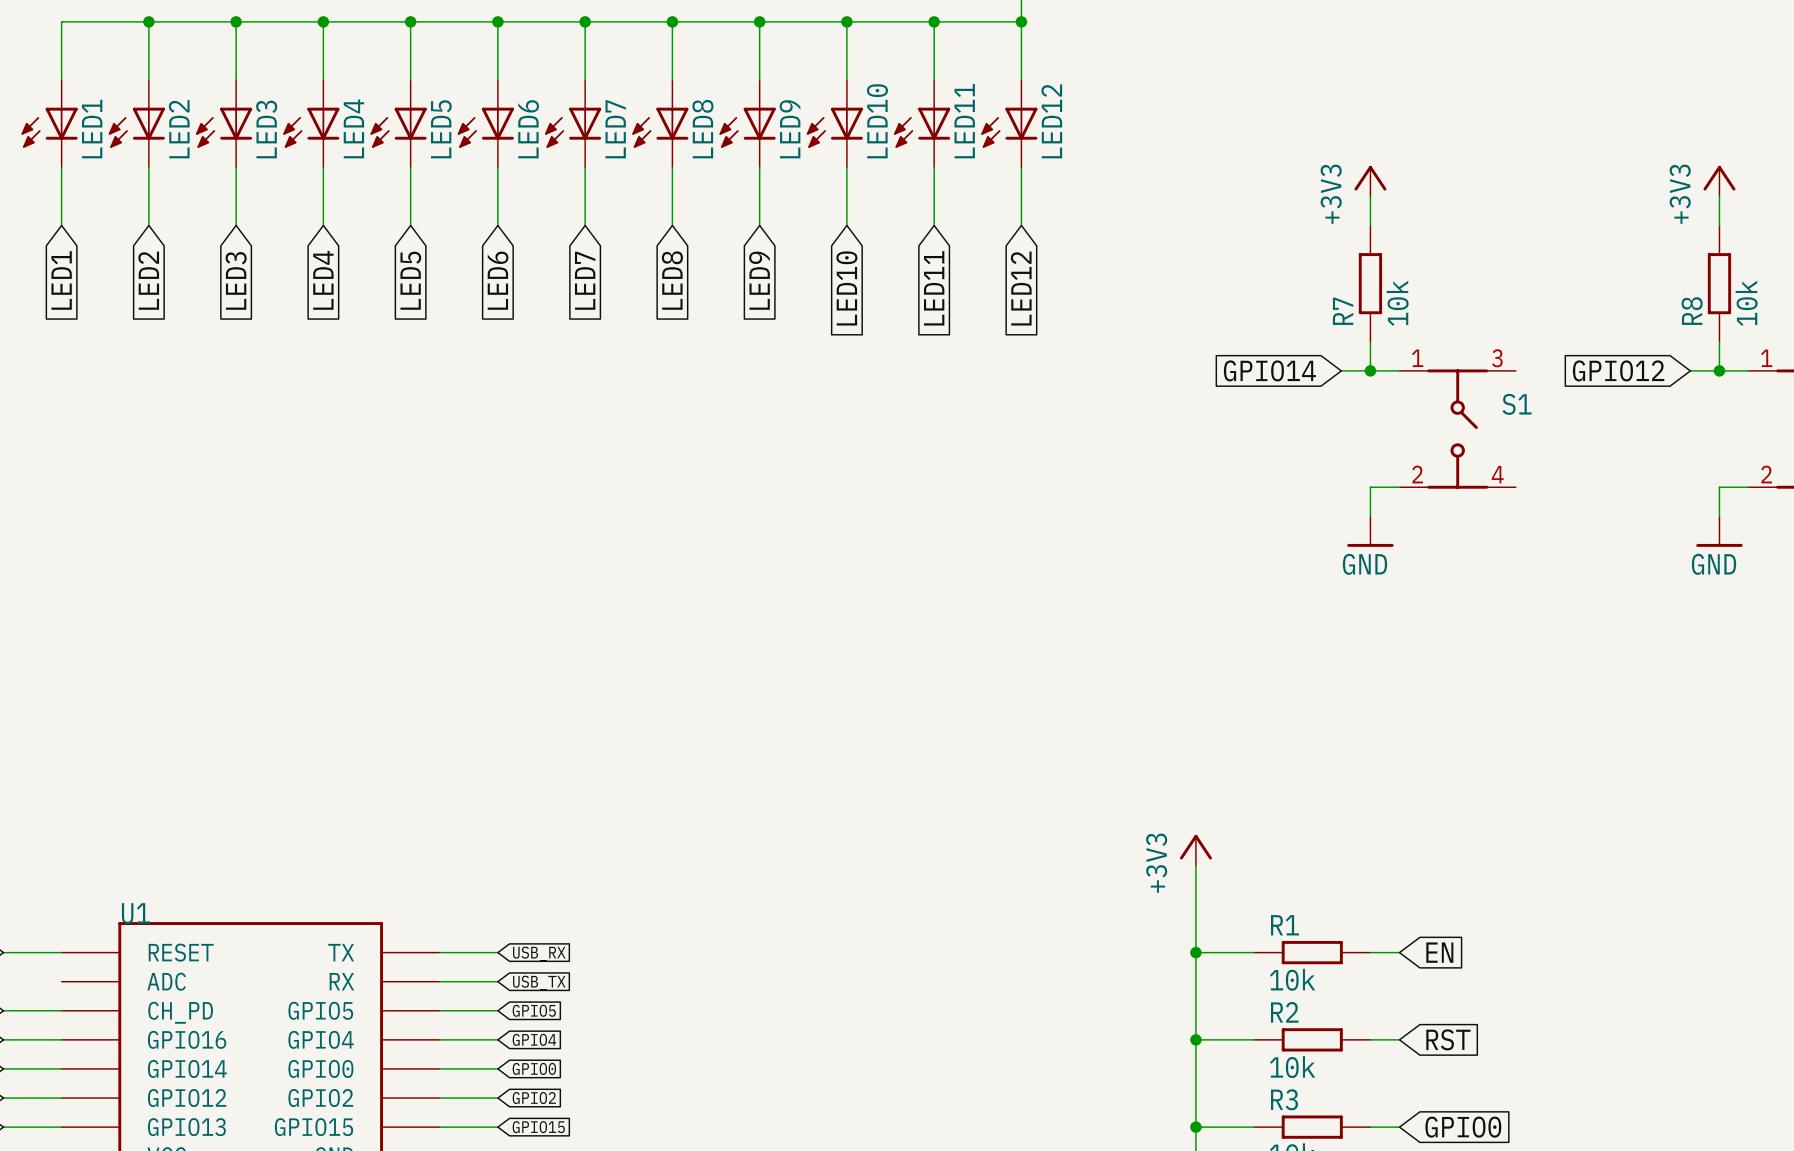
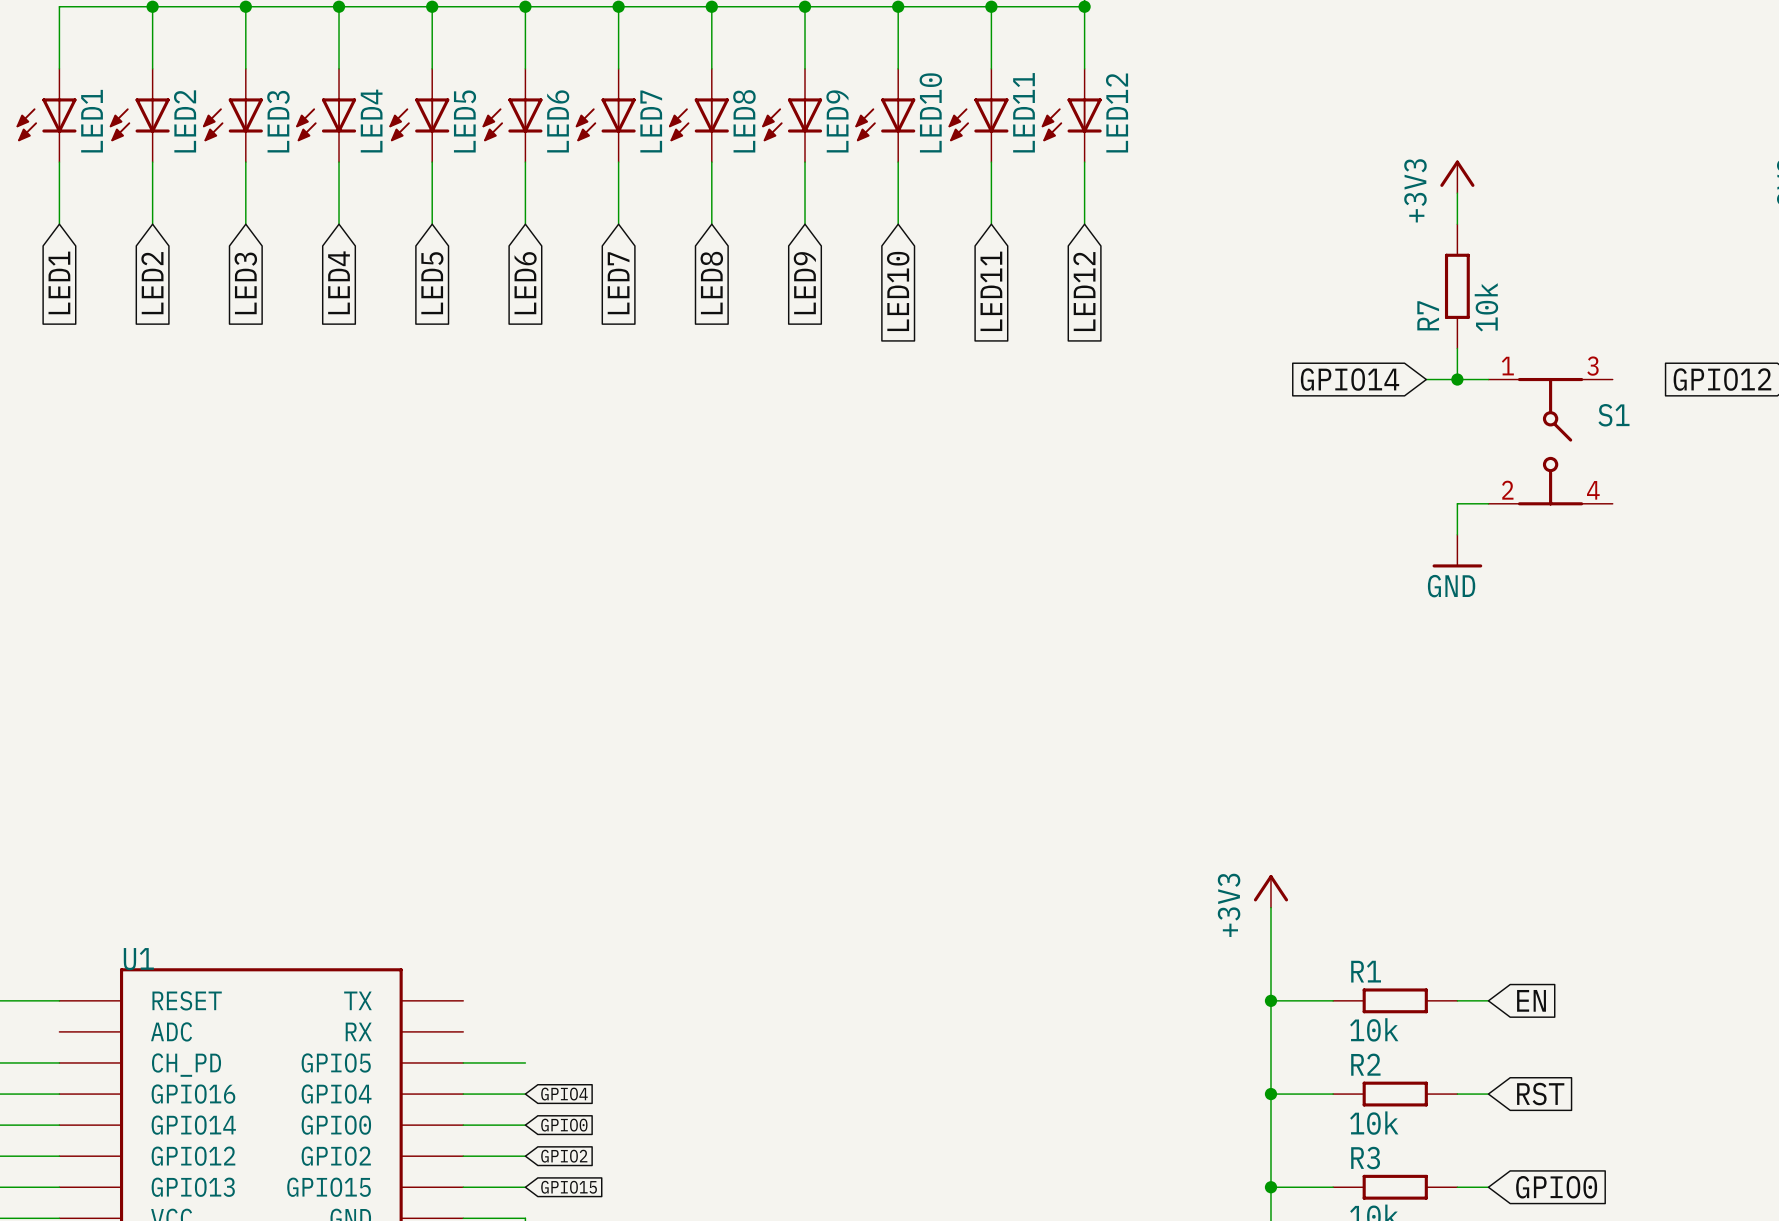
wire: (439, 952) (497, 952) -> none
global label: USB_RX (539, 953) -> none
wire: (439, 981) (497, 981) -> none
global label: USB_TX (539, 983) -> none
global label: GPIO5 (534, 1010) -> none

